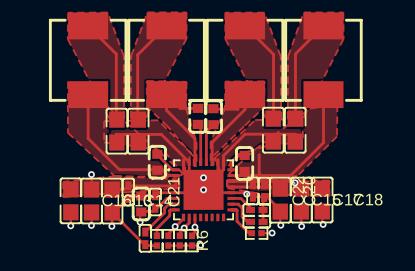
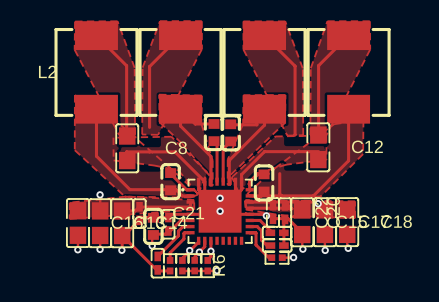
L2 name: none -> L2 (47, 71)
part: (273, 130) -> none
part: (295, 130) -> none
C12: none -> (318, 147)
part: (116, 131) -> none
C8: none -> (127, 148)
part: (138, 131) -> none
C21 name rotation: 0° (173, 192) -> 90° clockwise (188, 213)

